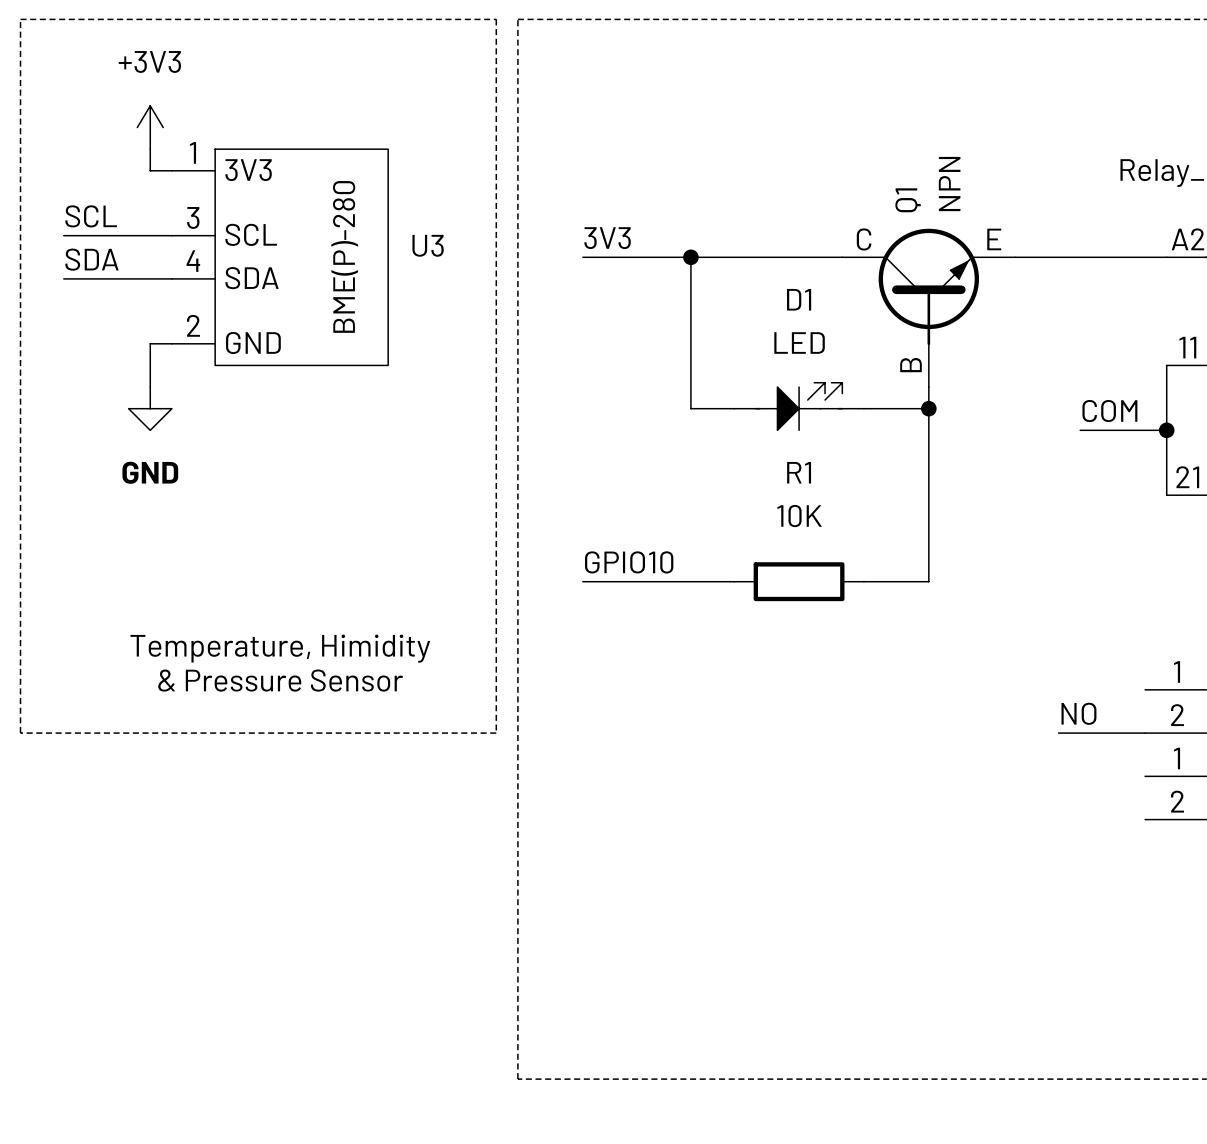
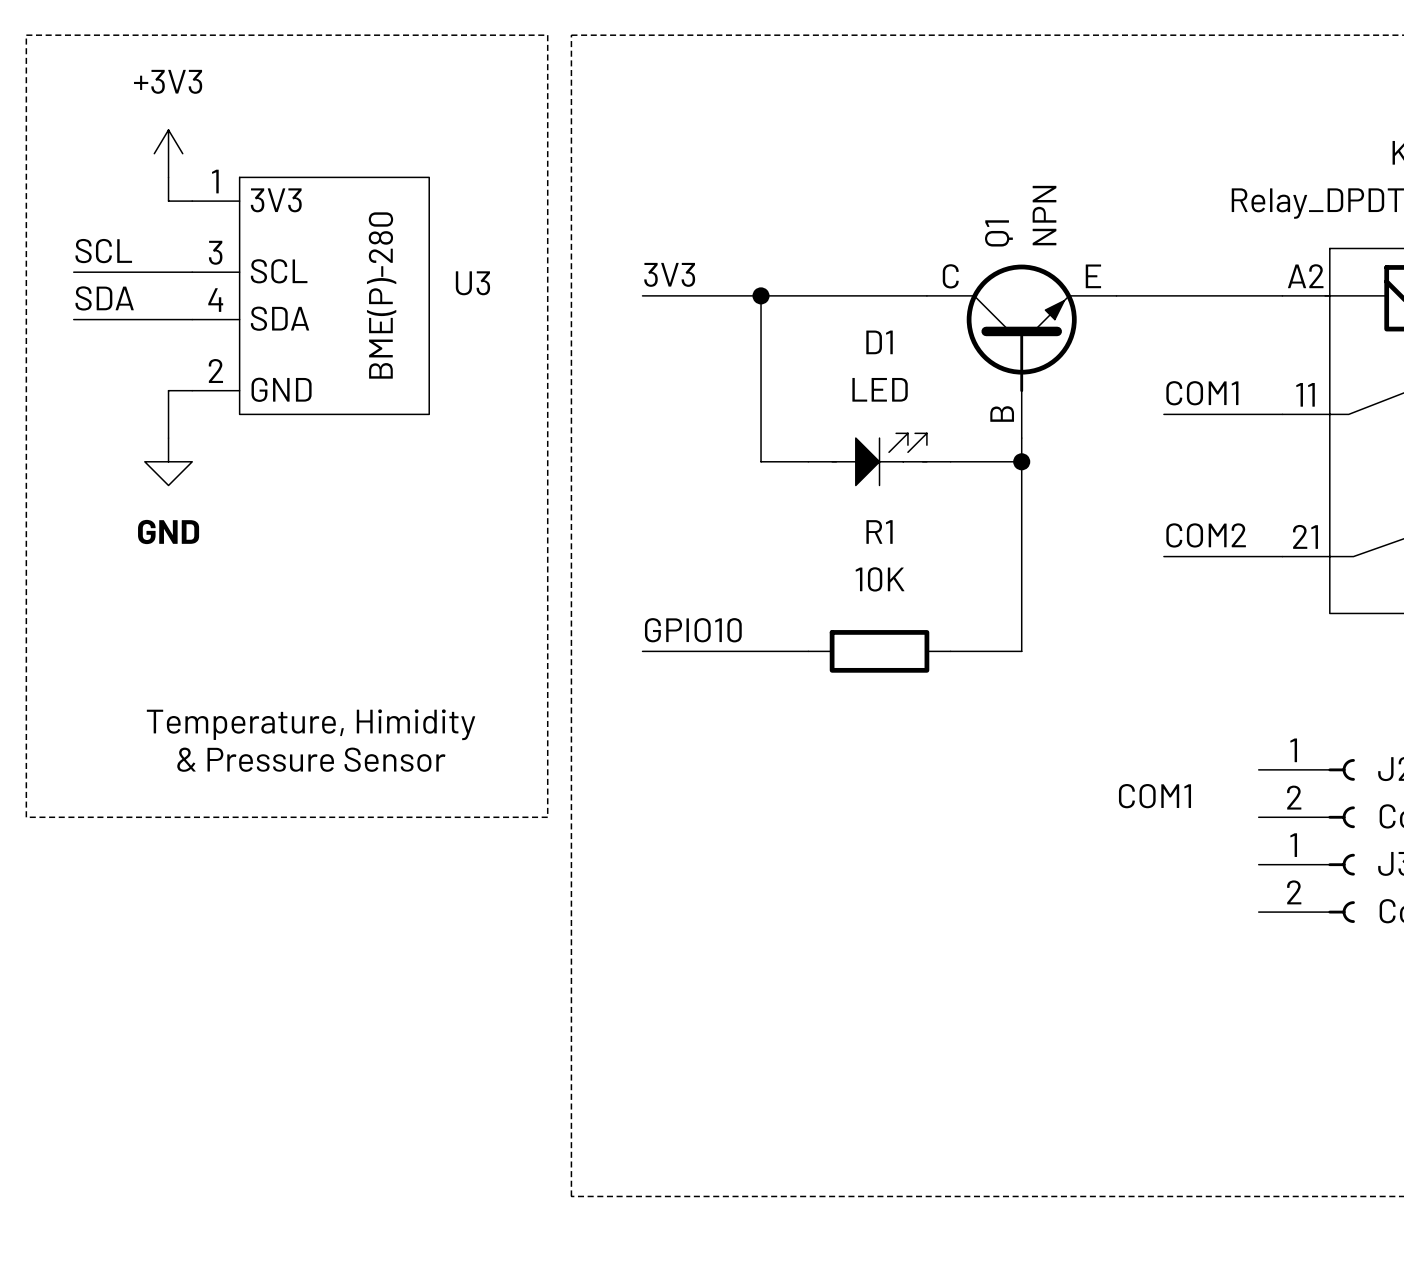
label: none -> COM1 (1202, 393)
wire: (1166, 365) (1166, 495) -> (1282, 414) (1163, 414)
label: COM (1109, 411) -> none
wire: (1080, 430) (1166, 430) -> none
junction: (1166, 430) -> none
label: none -> COM2 (1206, 535)
wire: none -> (1163, 556) (1282, 556)
label: none -> COM1 (1154, 796)
label: NO (1078, 713) -> none
wire: (1058, 733) (1145, 733) -> none

